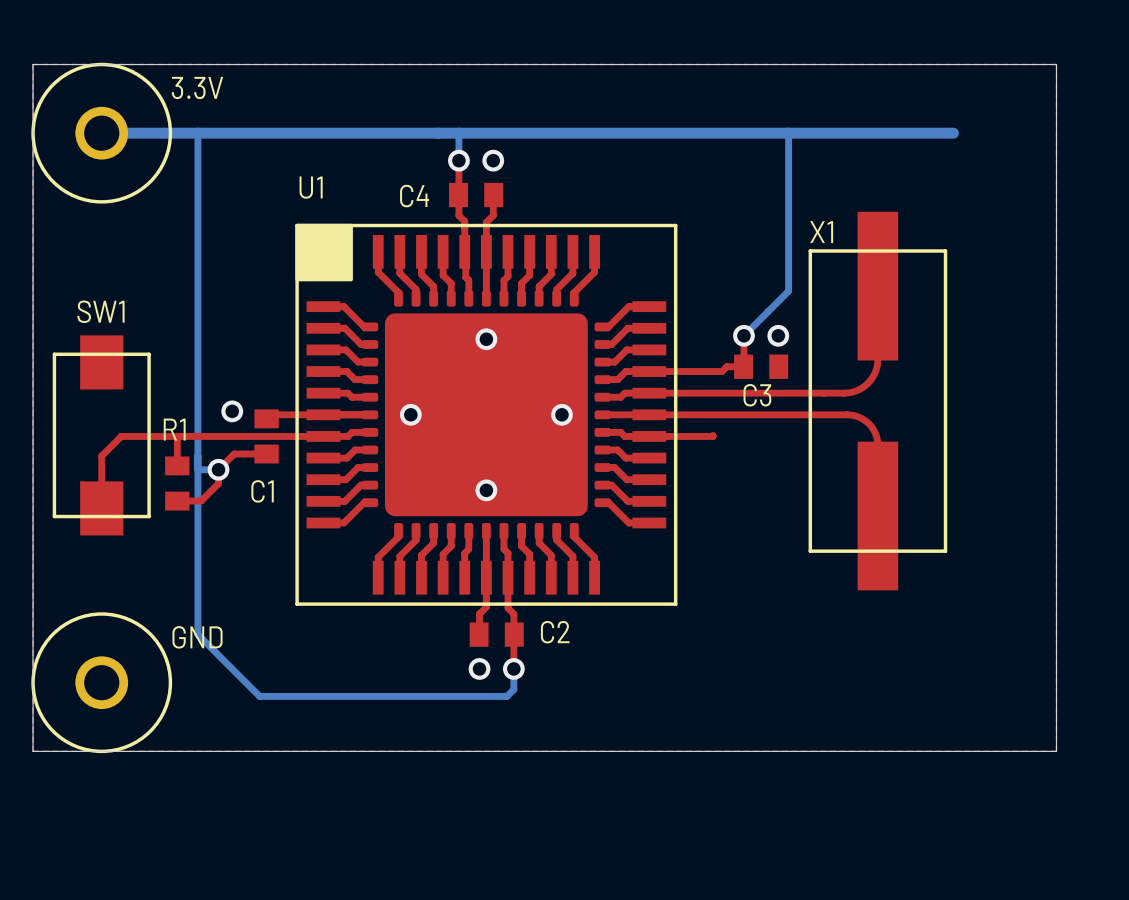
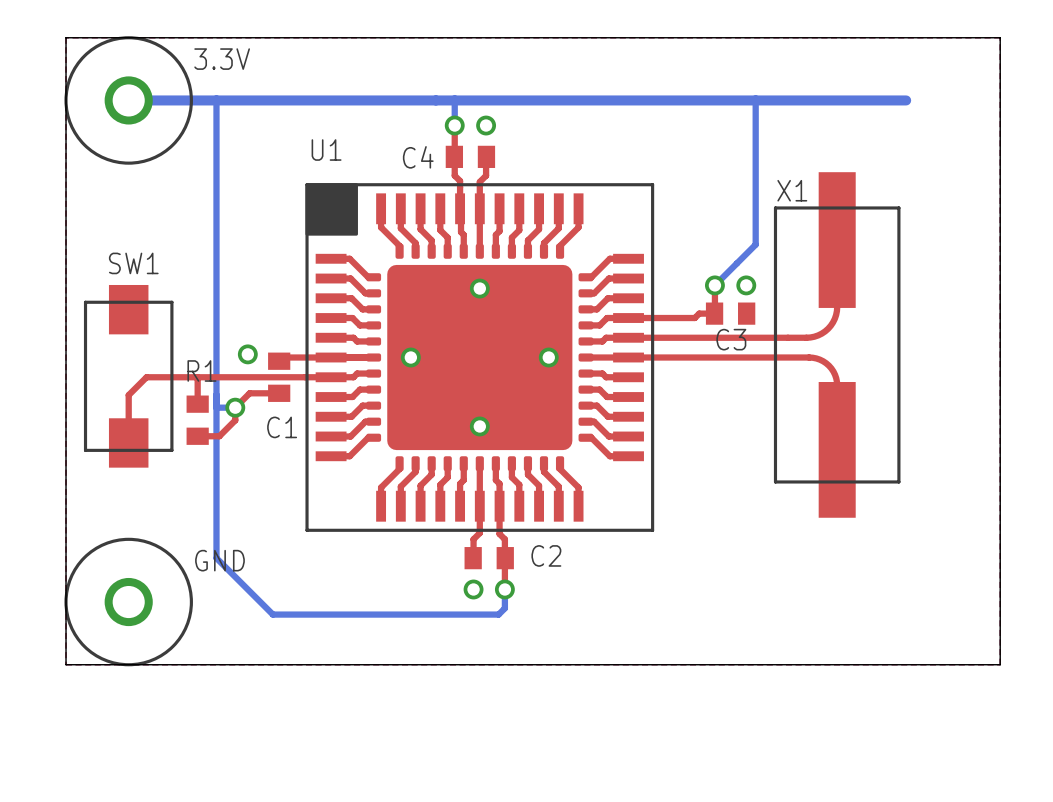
top track: (713, 435) (649, 436) -> none

